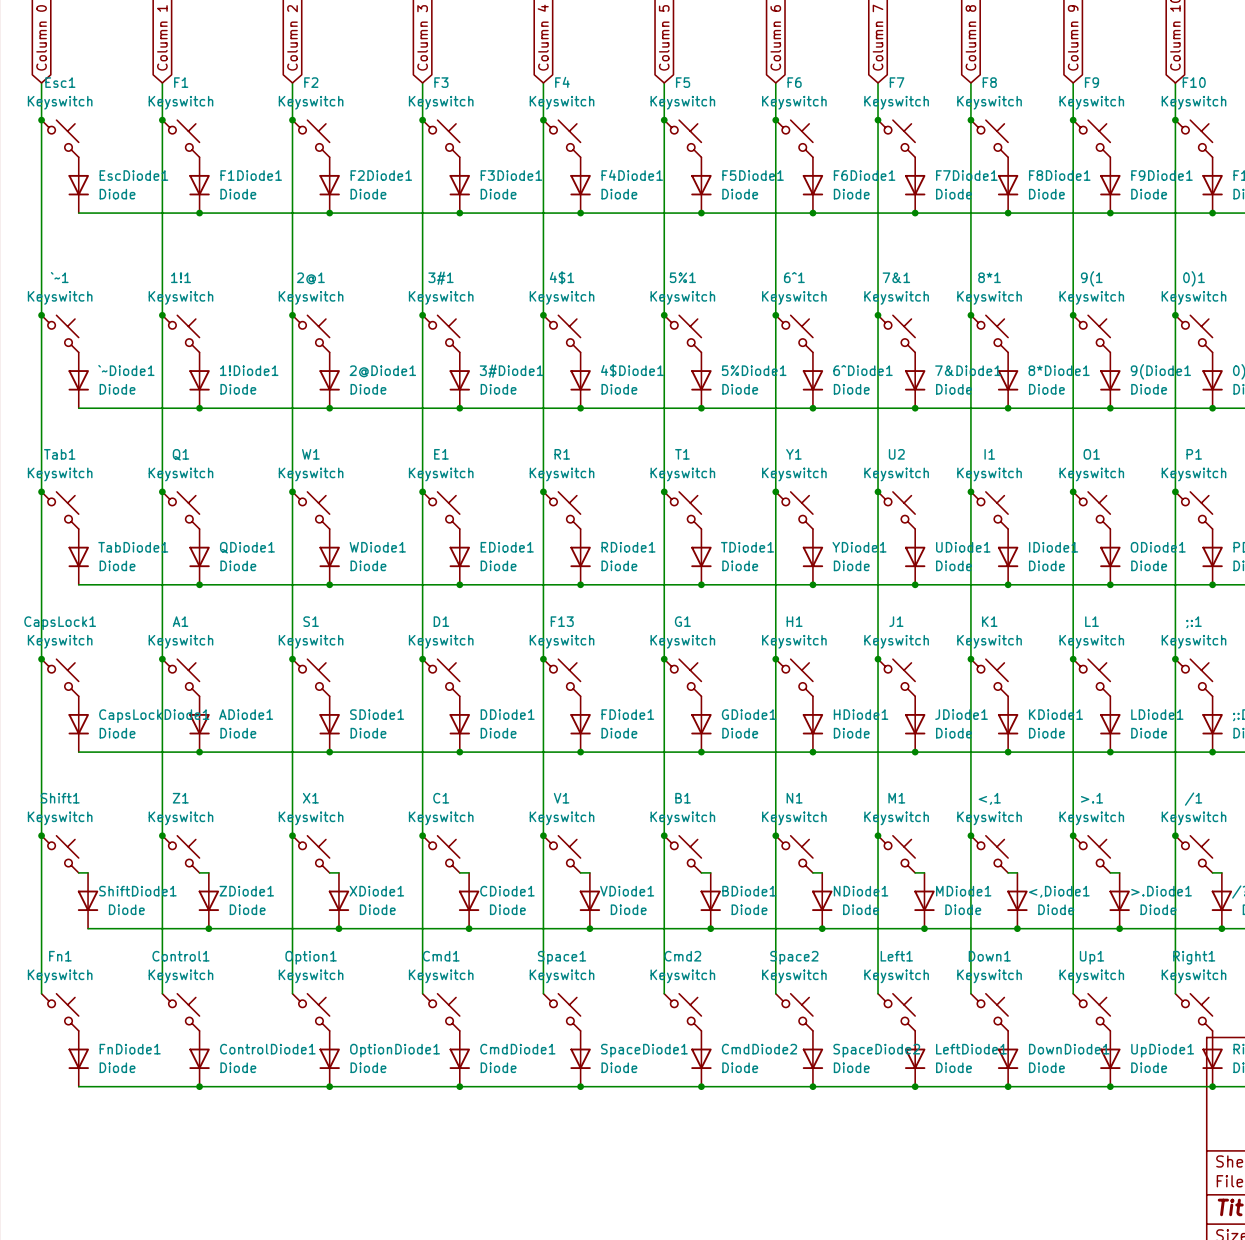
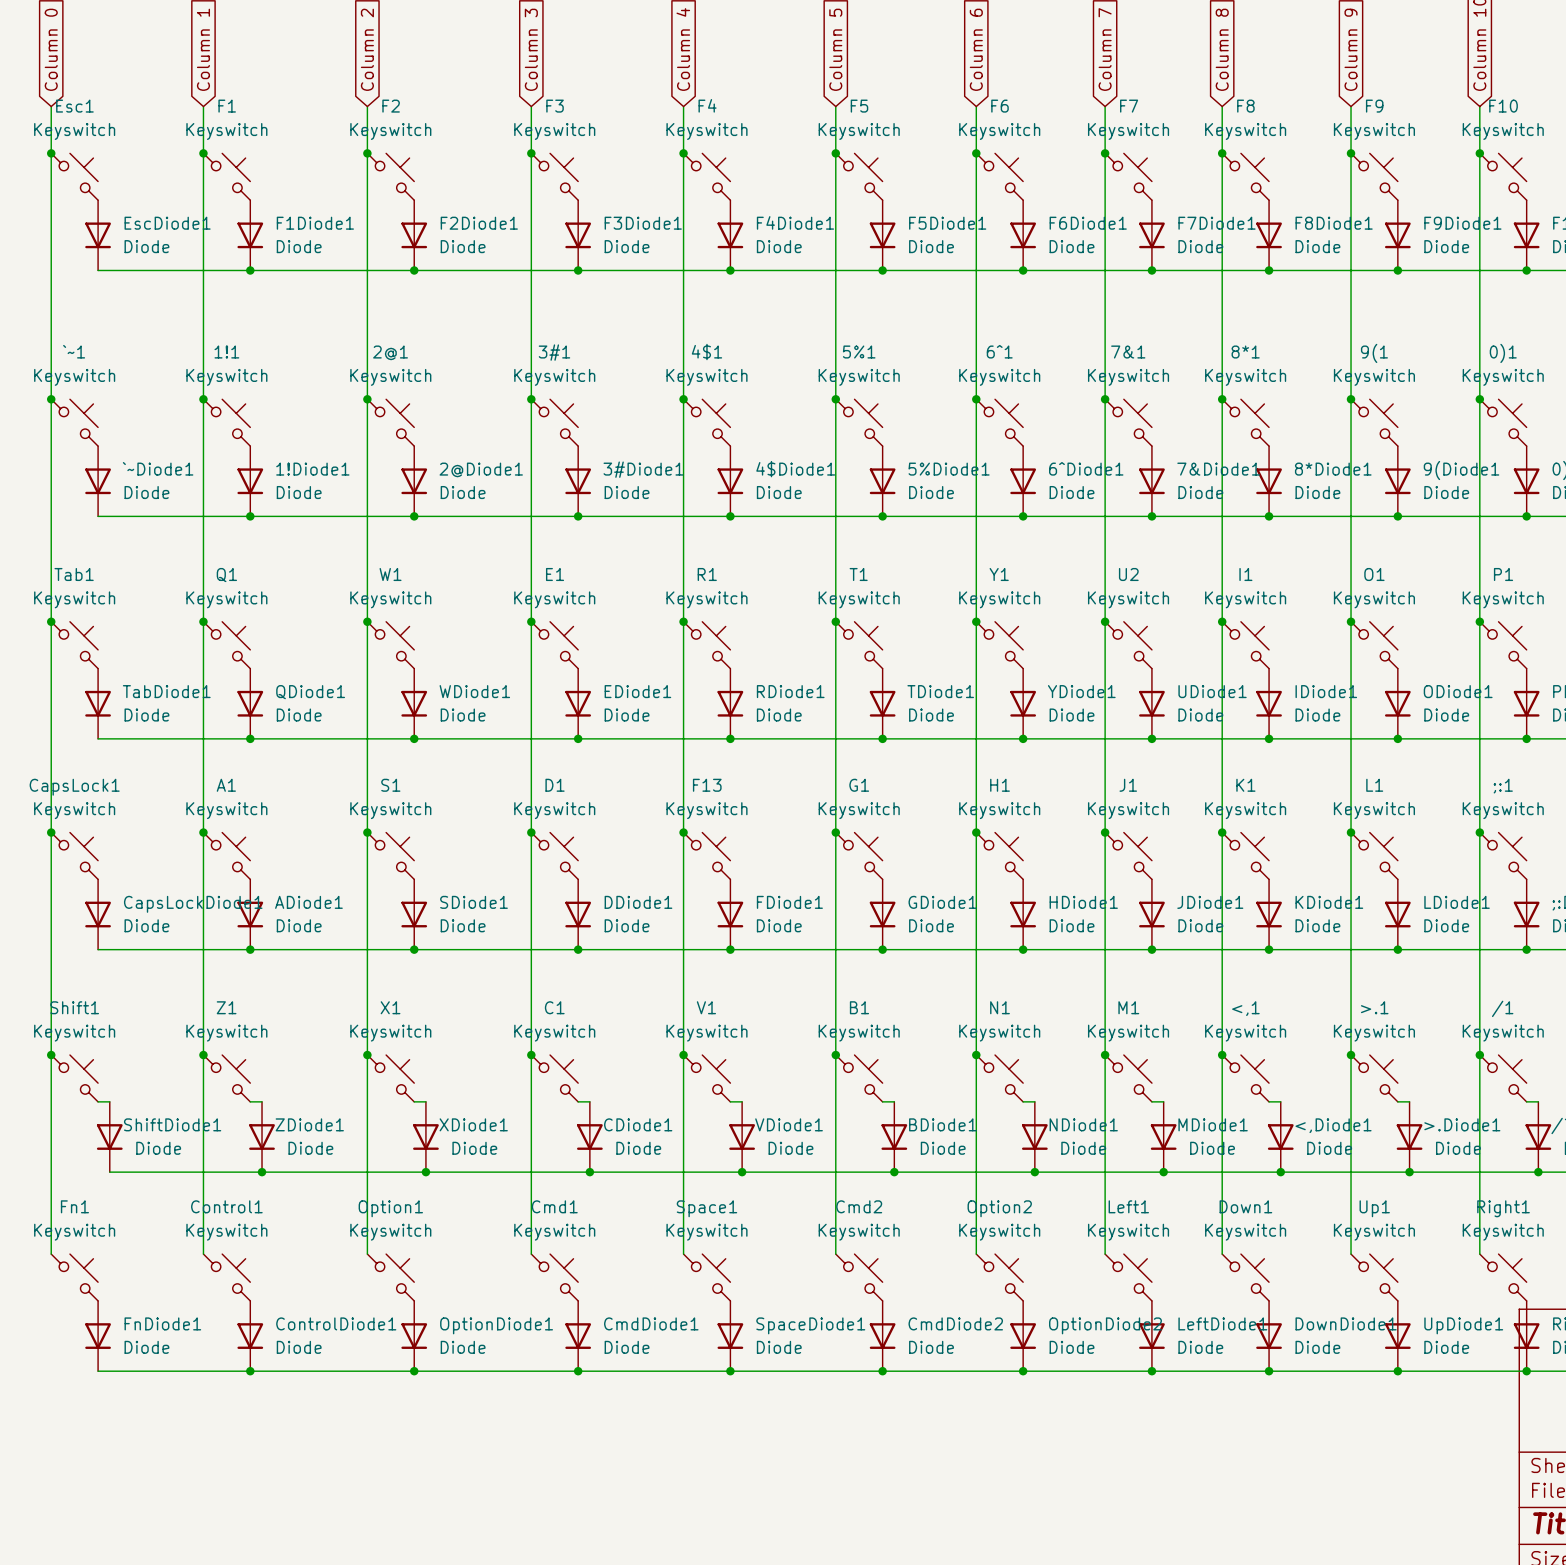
Space2 name: Space2 (794, 957) -> Option2 (999, 1208)
SpaceDiode2 name: SpaceDiode2 (876, 1050) -> OptionDiode2 (1105, 1325)

